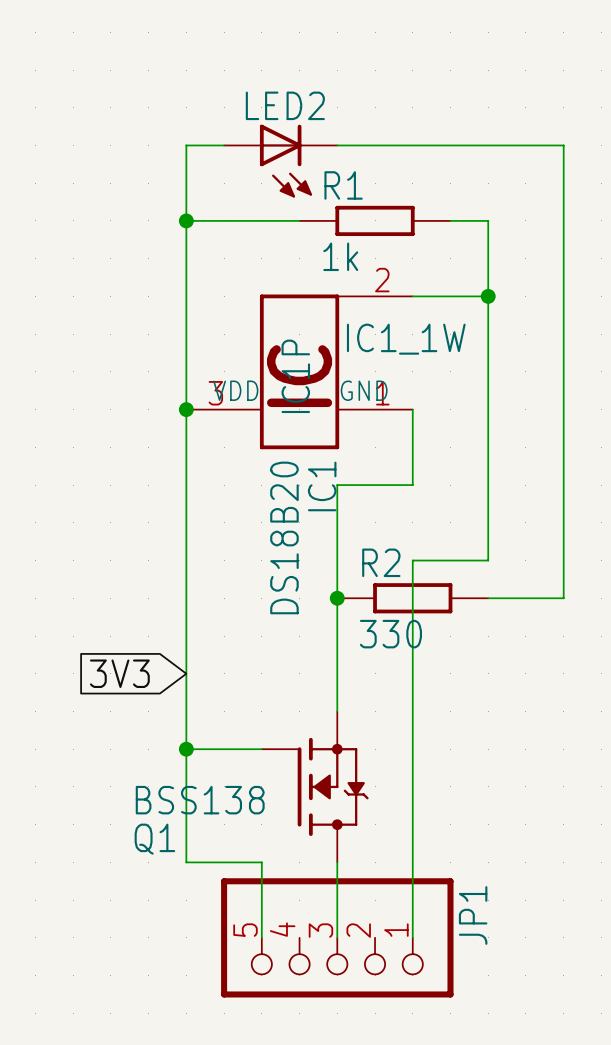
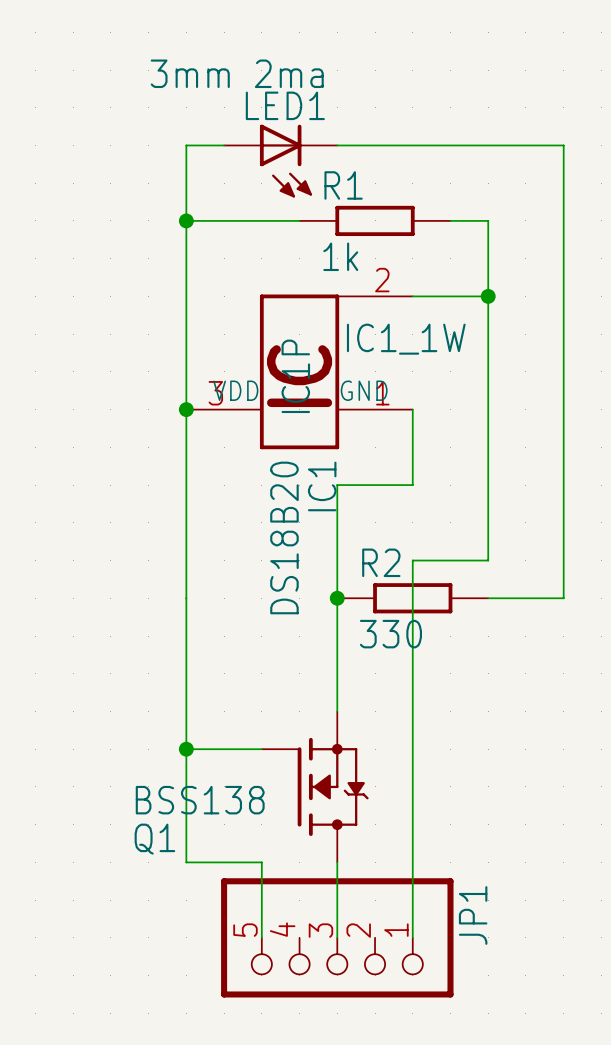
LED2 value: none -> 3mm 2ma (237, 73)
LED2 name: LED2 (285, 105) -> LED1 (285, 105)
global label: 3V3 (119, 673) -> none

